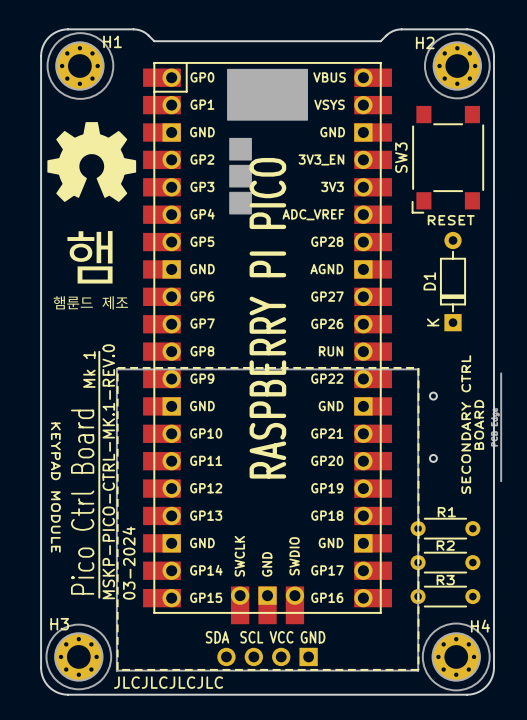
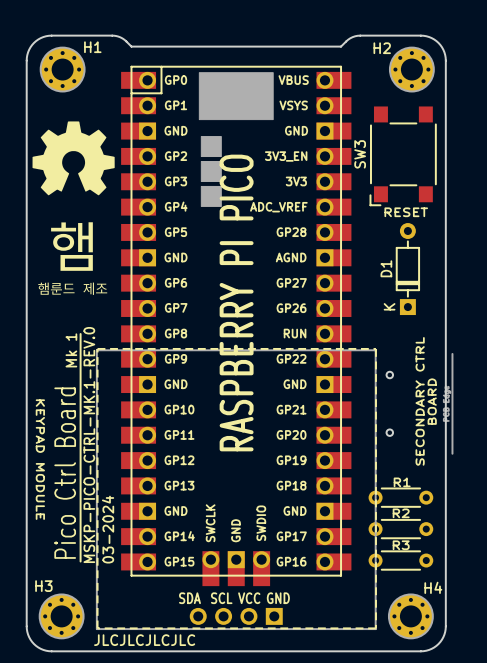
drawing: [46, 32, 115, 100] -> none
drawing: [424, 32, 491, 100] -> none
drawing: [422, 622, 491, 692] -> none
drawing: [45, 623, 112, 691] -> none

